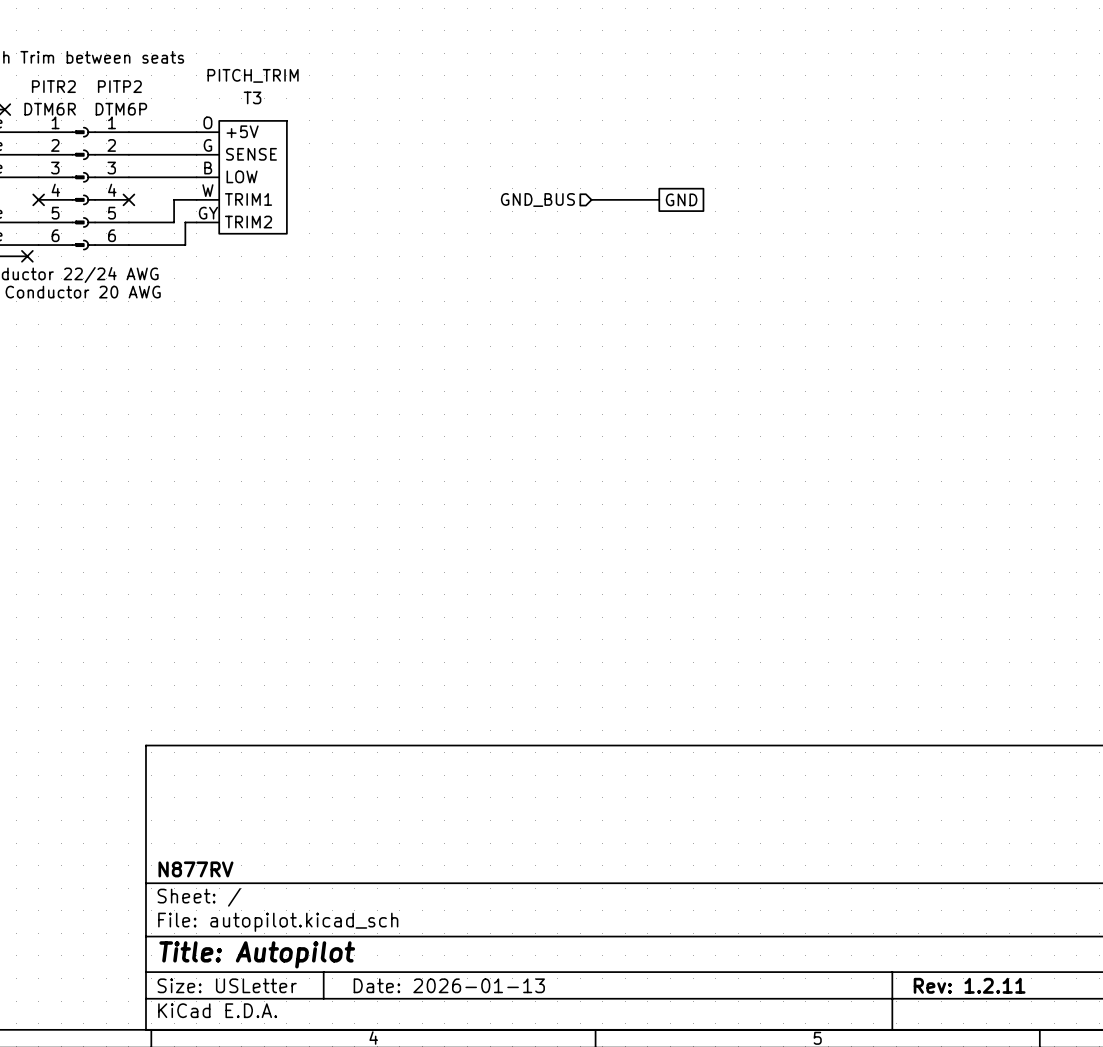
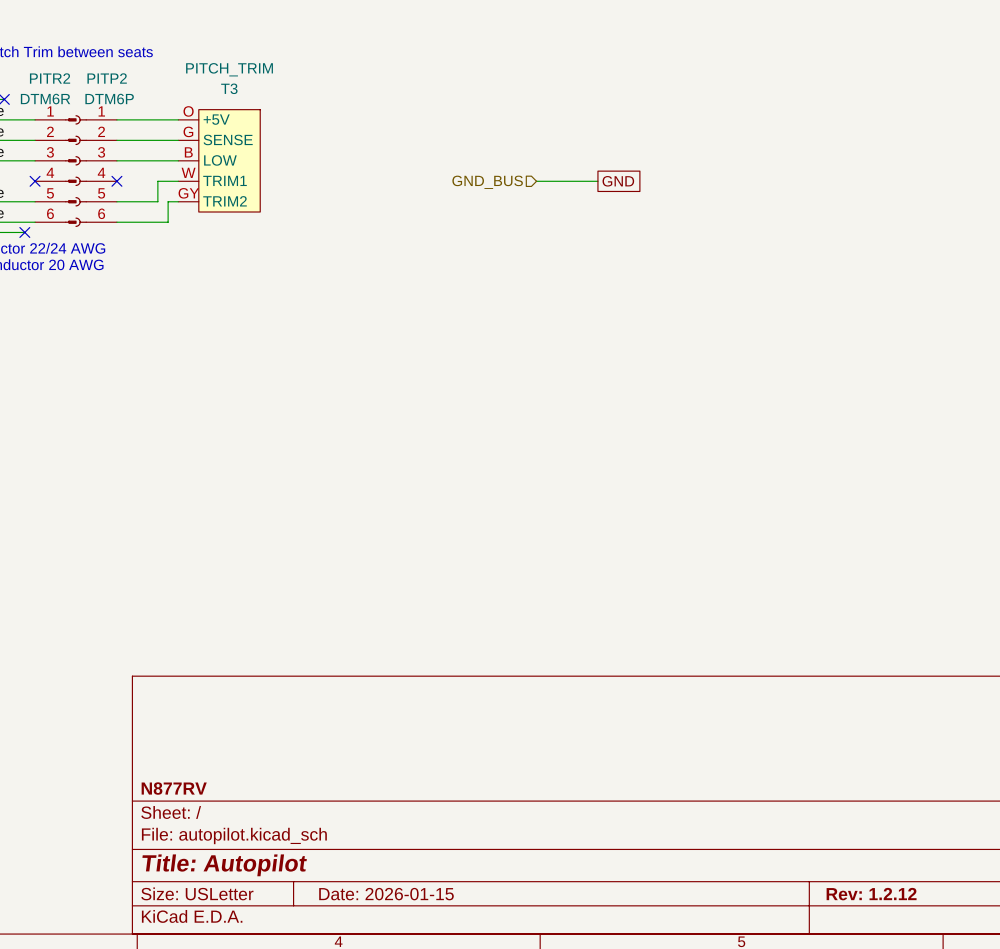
title block: Date: 2026-01-13 (449, 985) -> Date: 2026-01-15 (386, 894)
title block: Rev: 1.2.11 (969, 985) -> Rev: 1.2.12 (871, 894)

